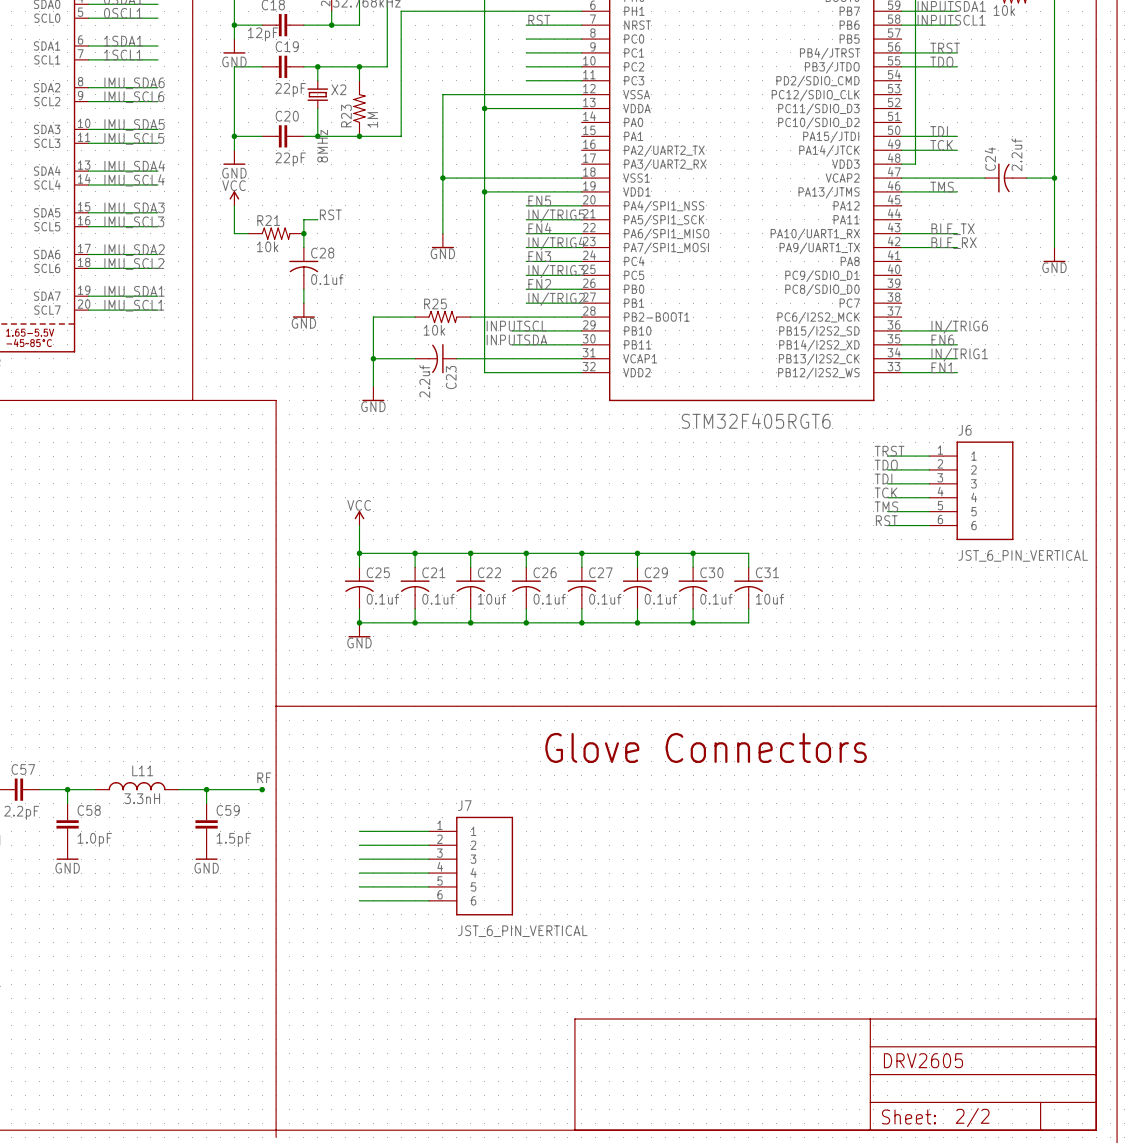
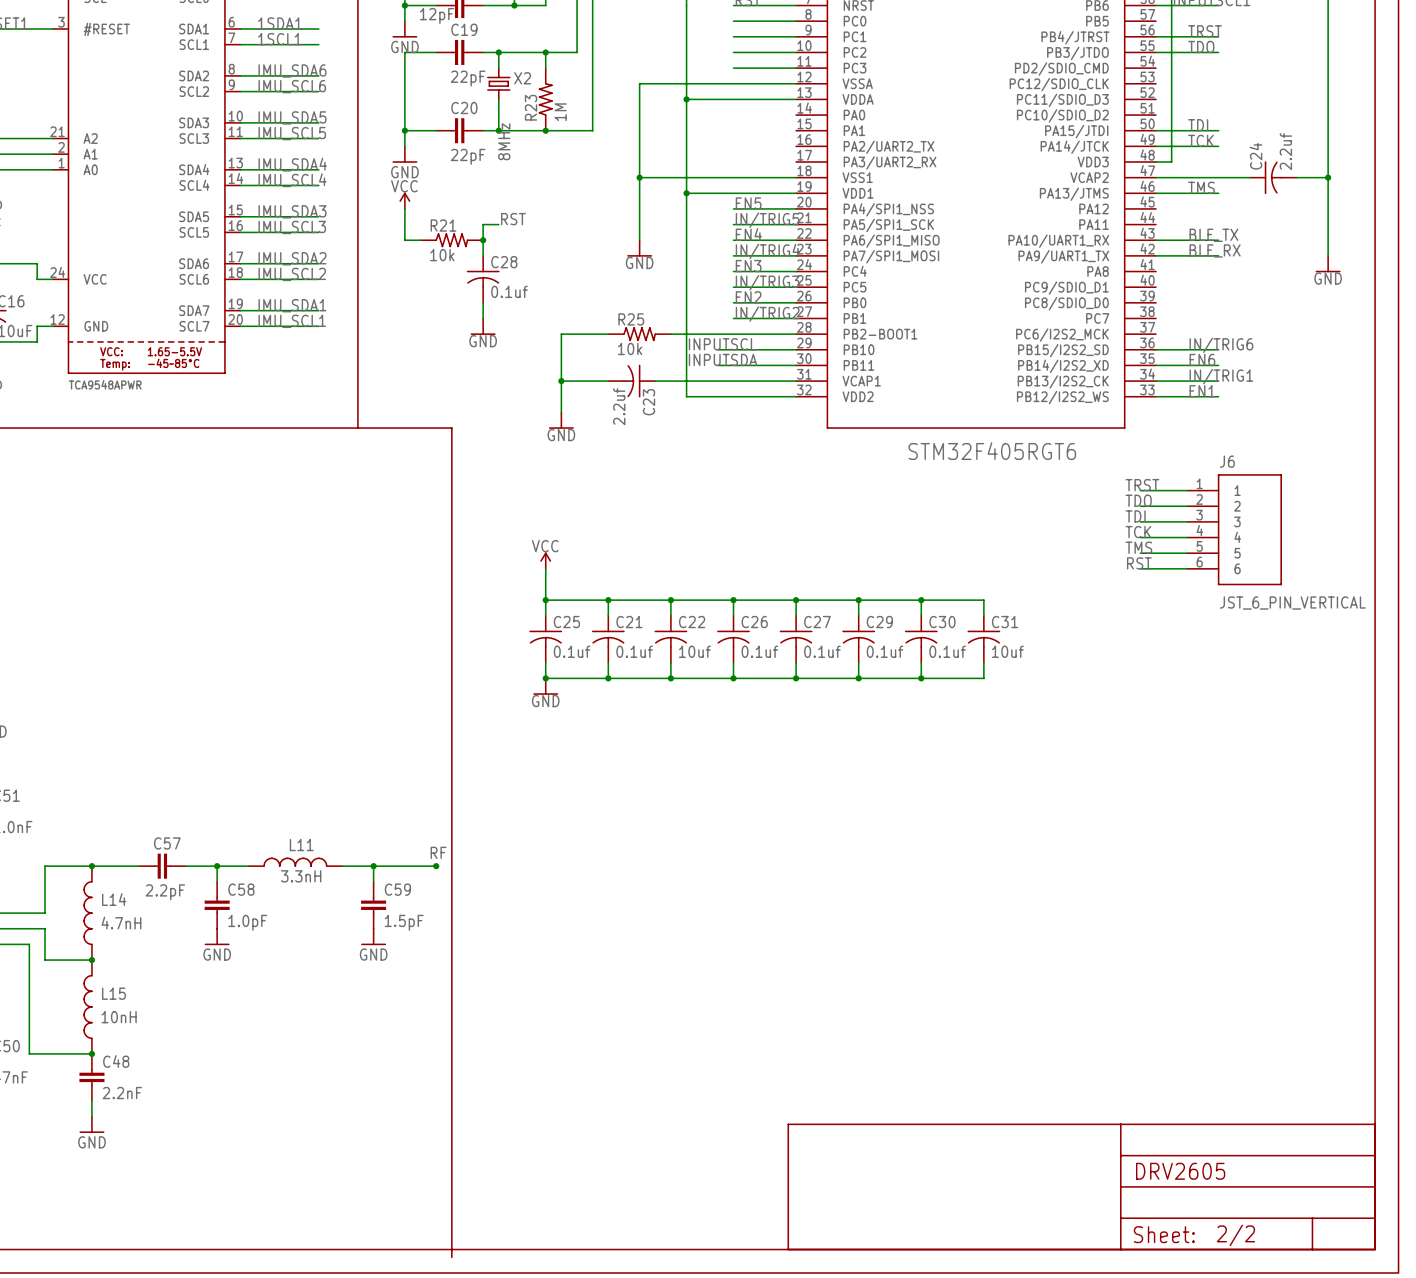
line: (276, 706) (1096, 706) -> none
text: Glove Connectors (706, 747) -> none
wire: (359, 831) (428, 831) -> none
wire: (359, 845) (428, 845) -> none
wire: (359, 859) (428, 859) -> none
J7: JST_6_PIN_VERTICAL (471, 866) -> none
wire: (359, 873) (428, 873) -> none
wire: (359, 886) (428, 886) -> none
wire: (359, 900) (428, 900) -> none

